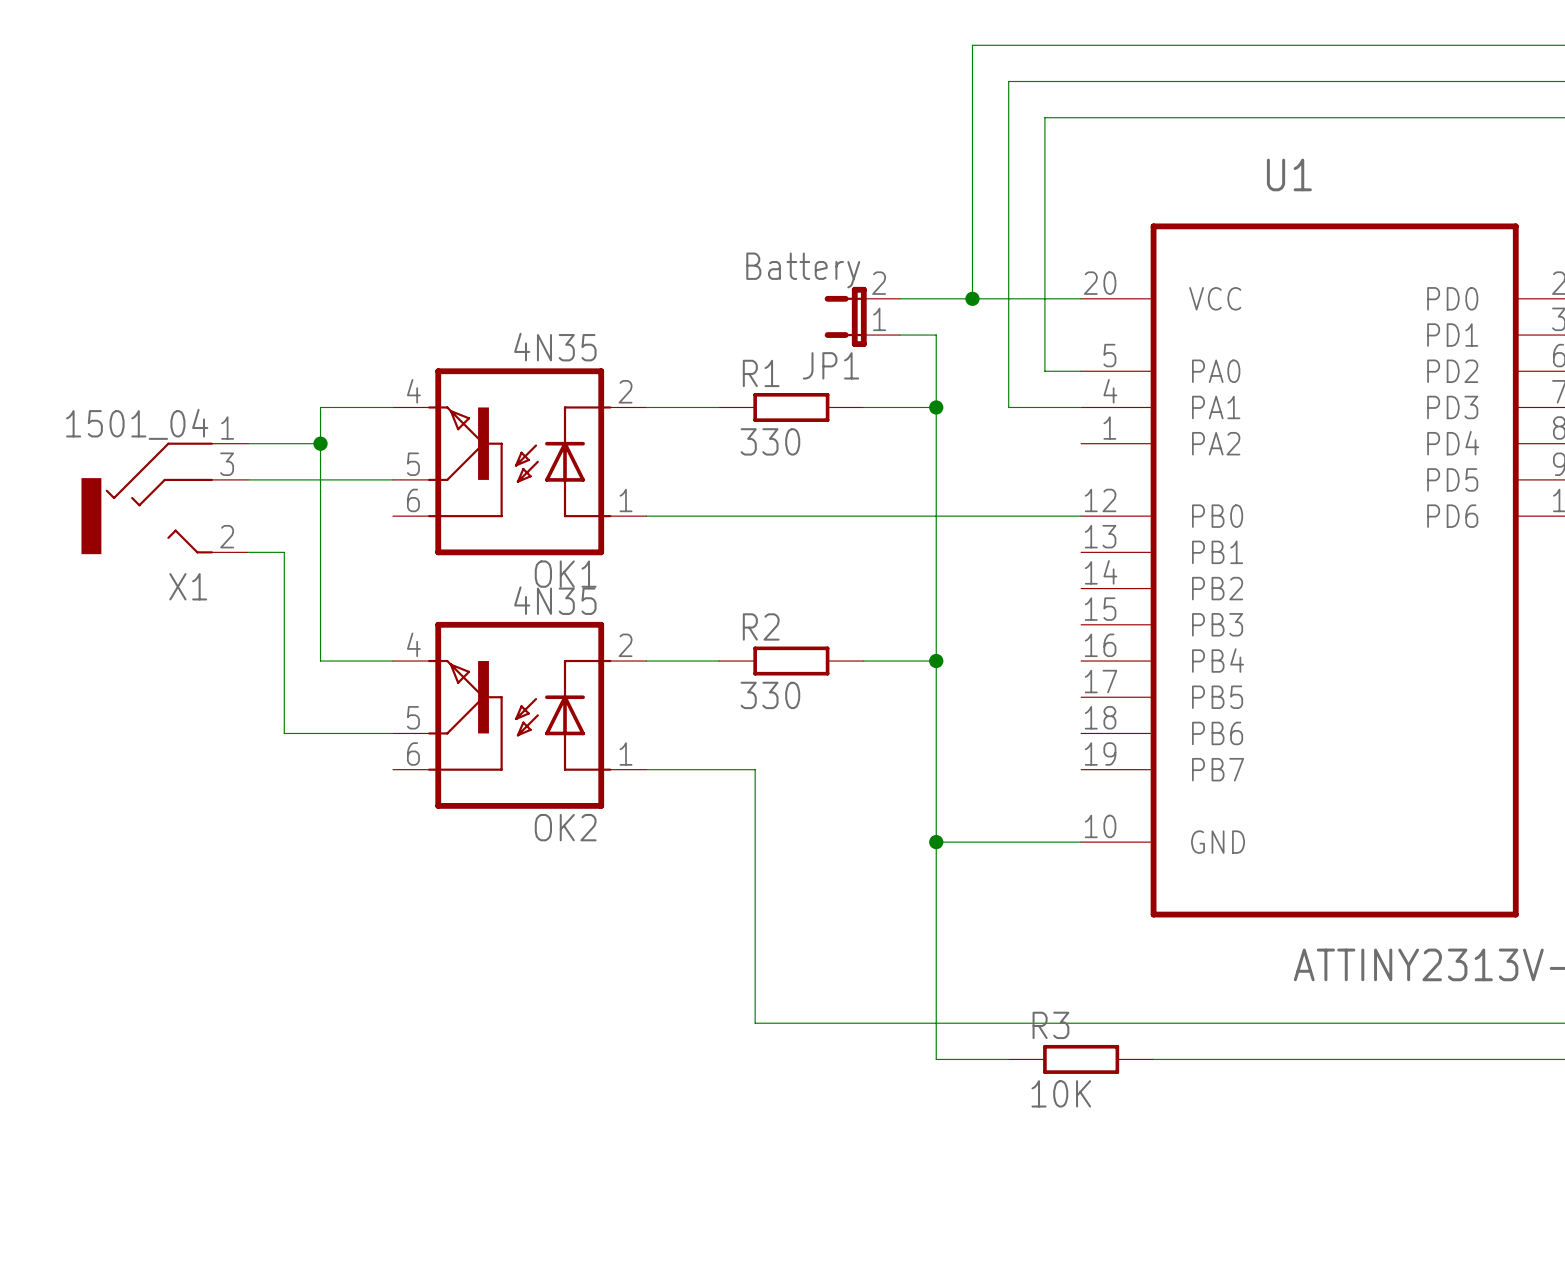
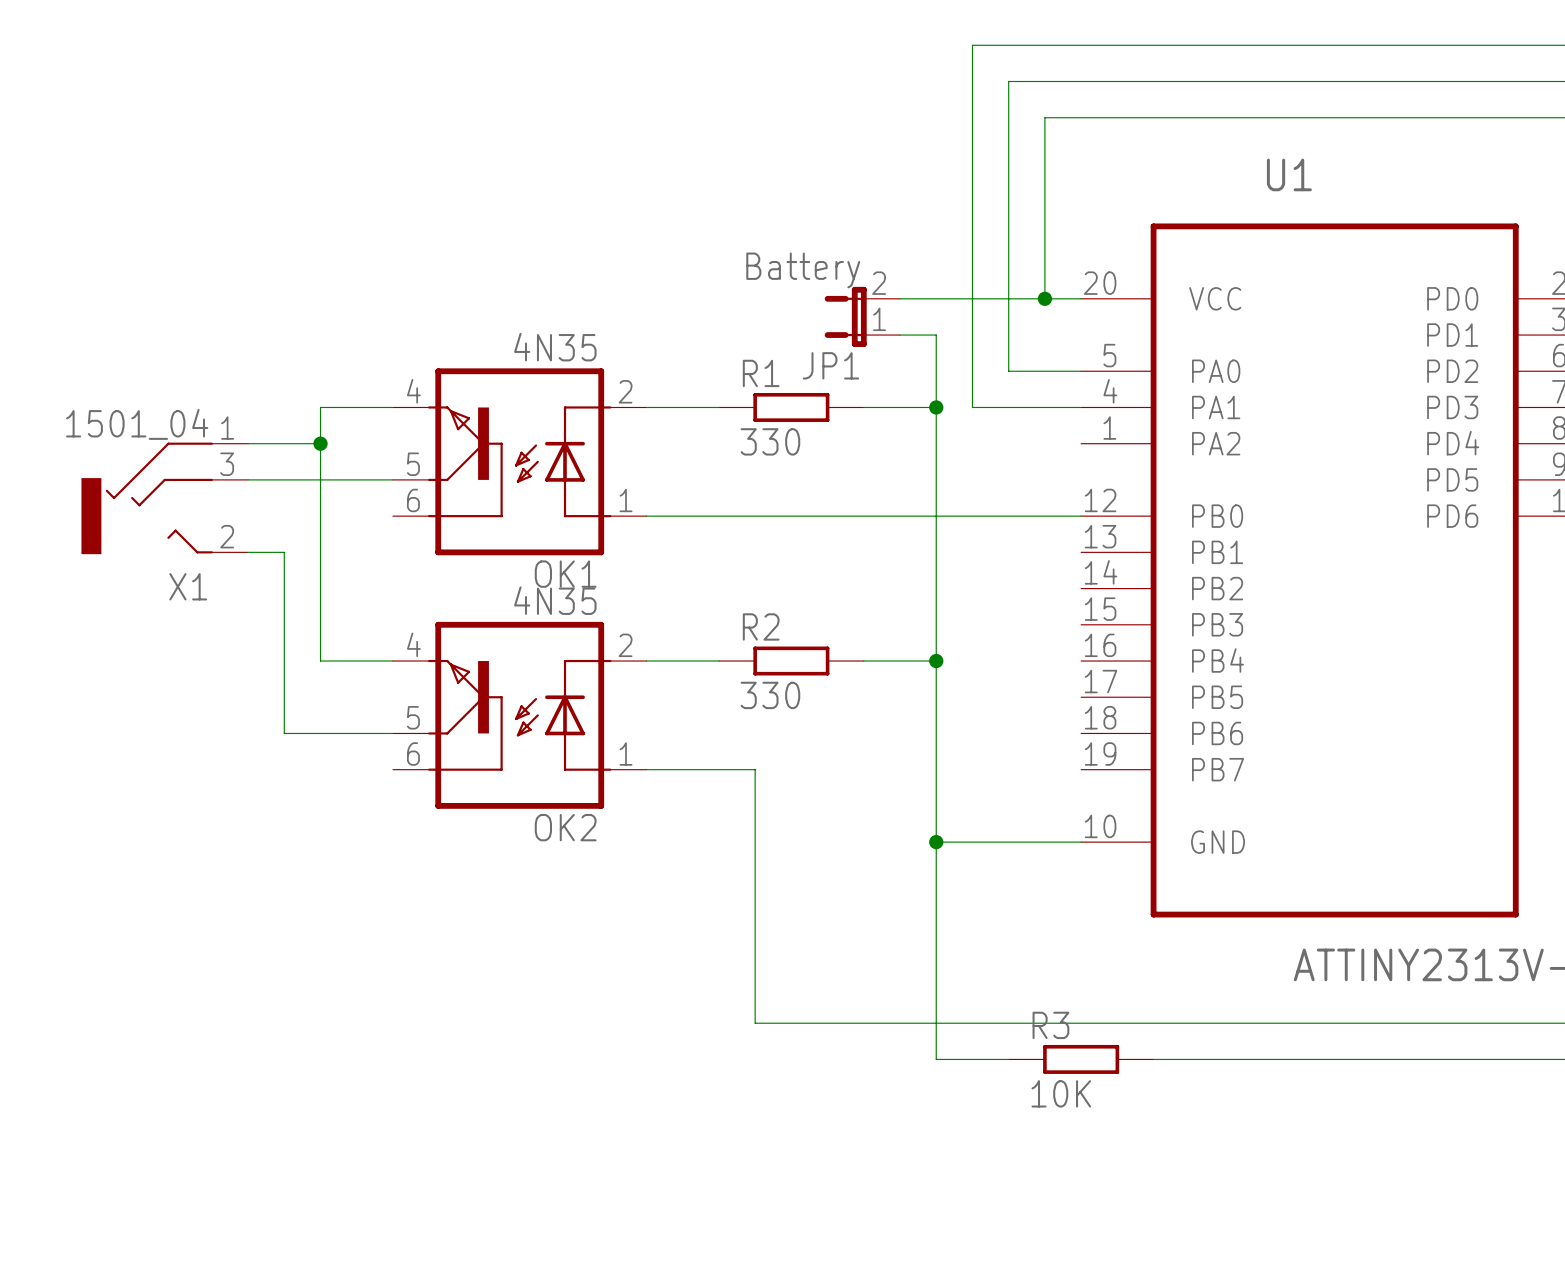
wire: none -> (972, 298) (972, 407) (1008, 407)
junction position: (972, 298) -> (1044, 298)
wire: (1044, 298) (1044, 371) -> none
wire: (1008, 371) (1008, 407) -> (1008, 371) (1044, 371)

